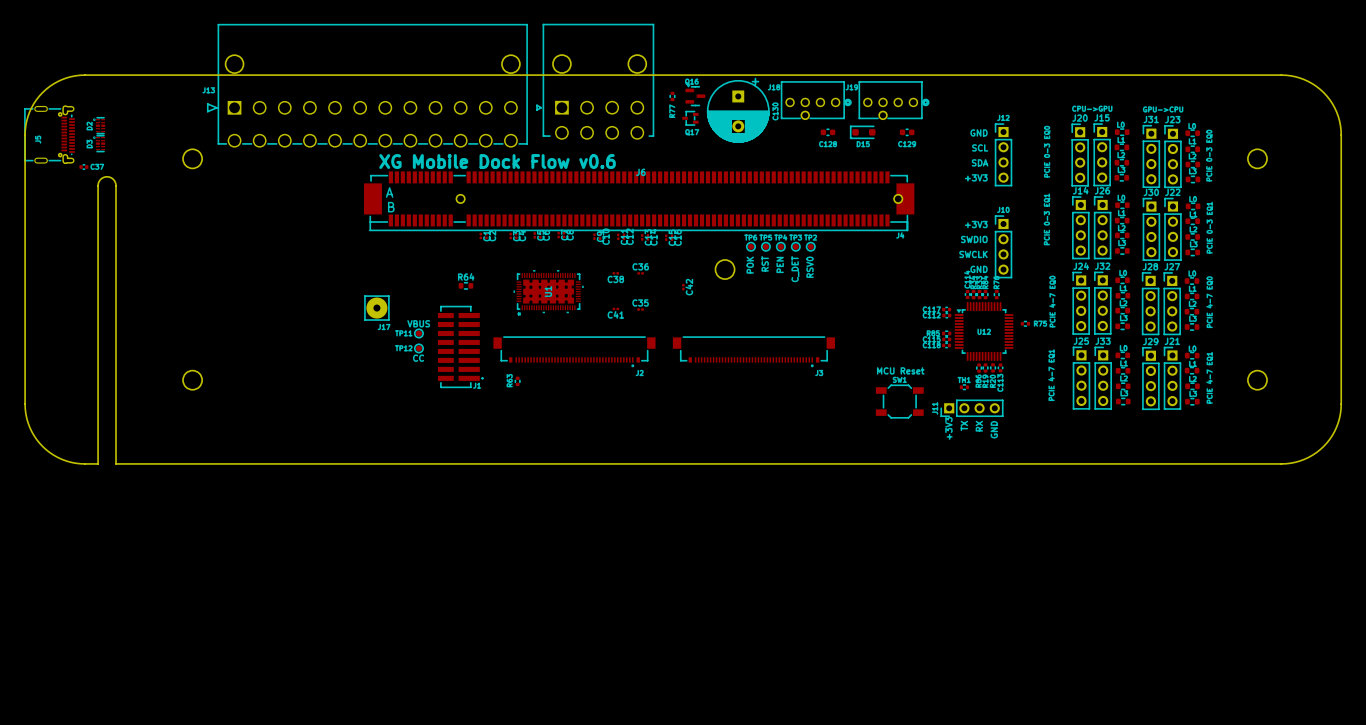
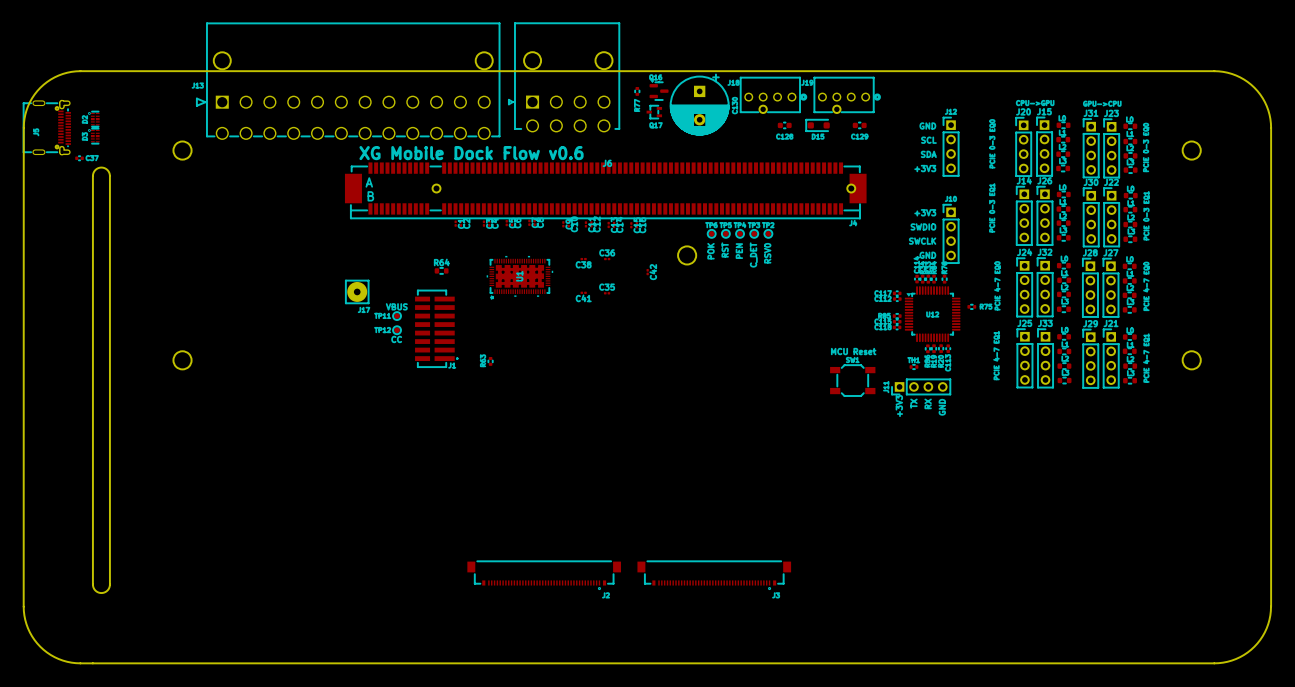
board edge: (25, 134) (25, 404) (26, 418) (36, 439) (53, 455) (75, 463) (98, 463) -> (109, 439) (109, 584) (107, 590) (101, 593) (95, 590) (92, 584) (92, 439)
board edge: none -> (23, 127) (23, 611) (28, 628) (34, 639) (47, 652) (58, 659) (80, 663) (1218, 663) (1240, 657) (1254, 646) (1266, 628) (1271, 606)
part position: (574, 351) -> (544, 575)
part position: (753, 351) -> (714, 575)
board edge: (1341, 404) (1336, 427) (1323, 446) (1304, 459) (1286, 463) (116, 463) -> (1271, 383) (1271, 606)

